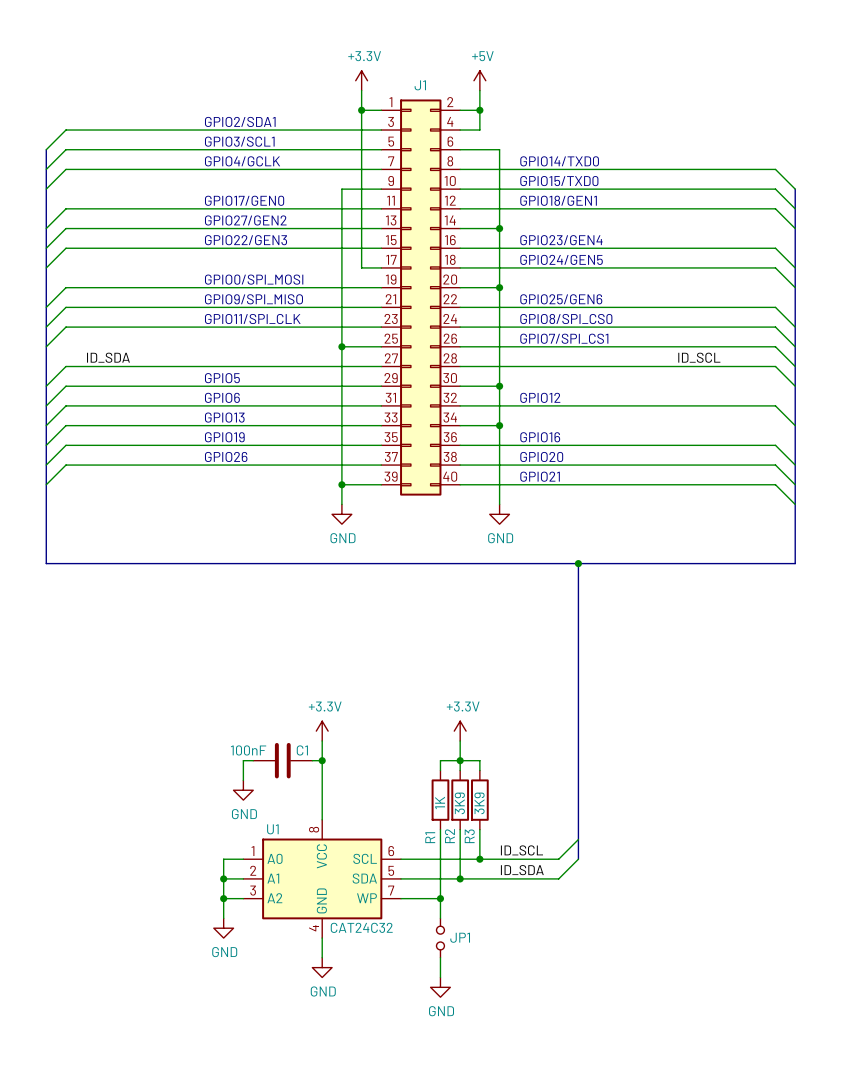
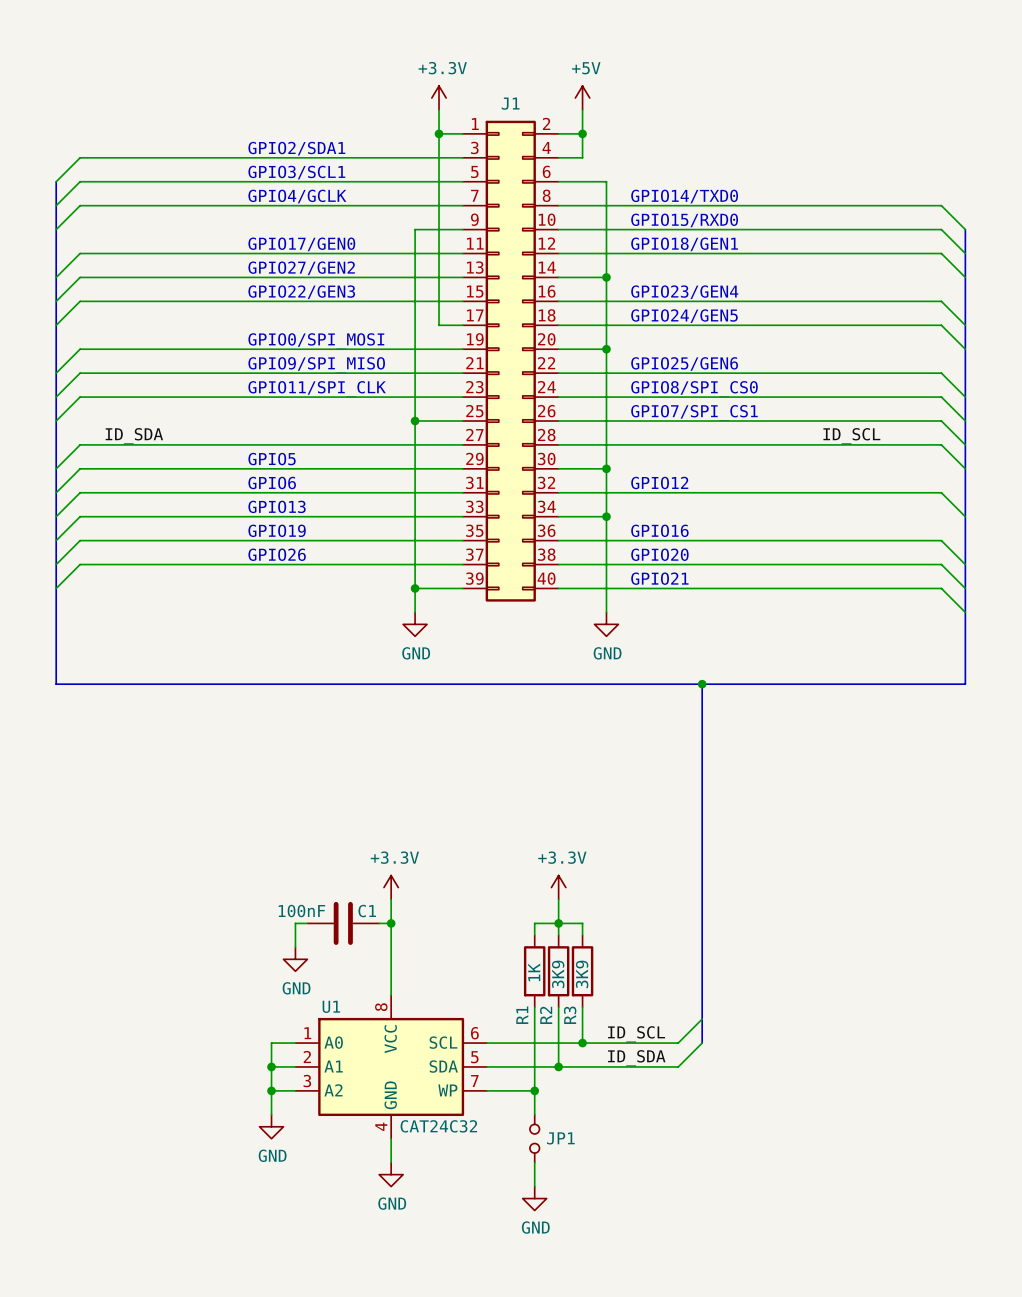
text: GPIO15/TXD0 (559, 181) -> GPIO15/RXD0 (684, 220)

